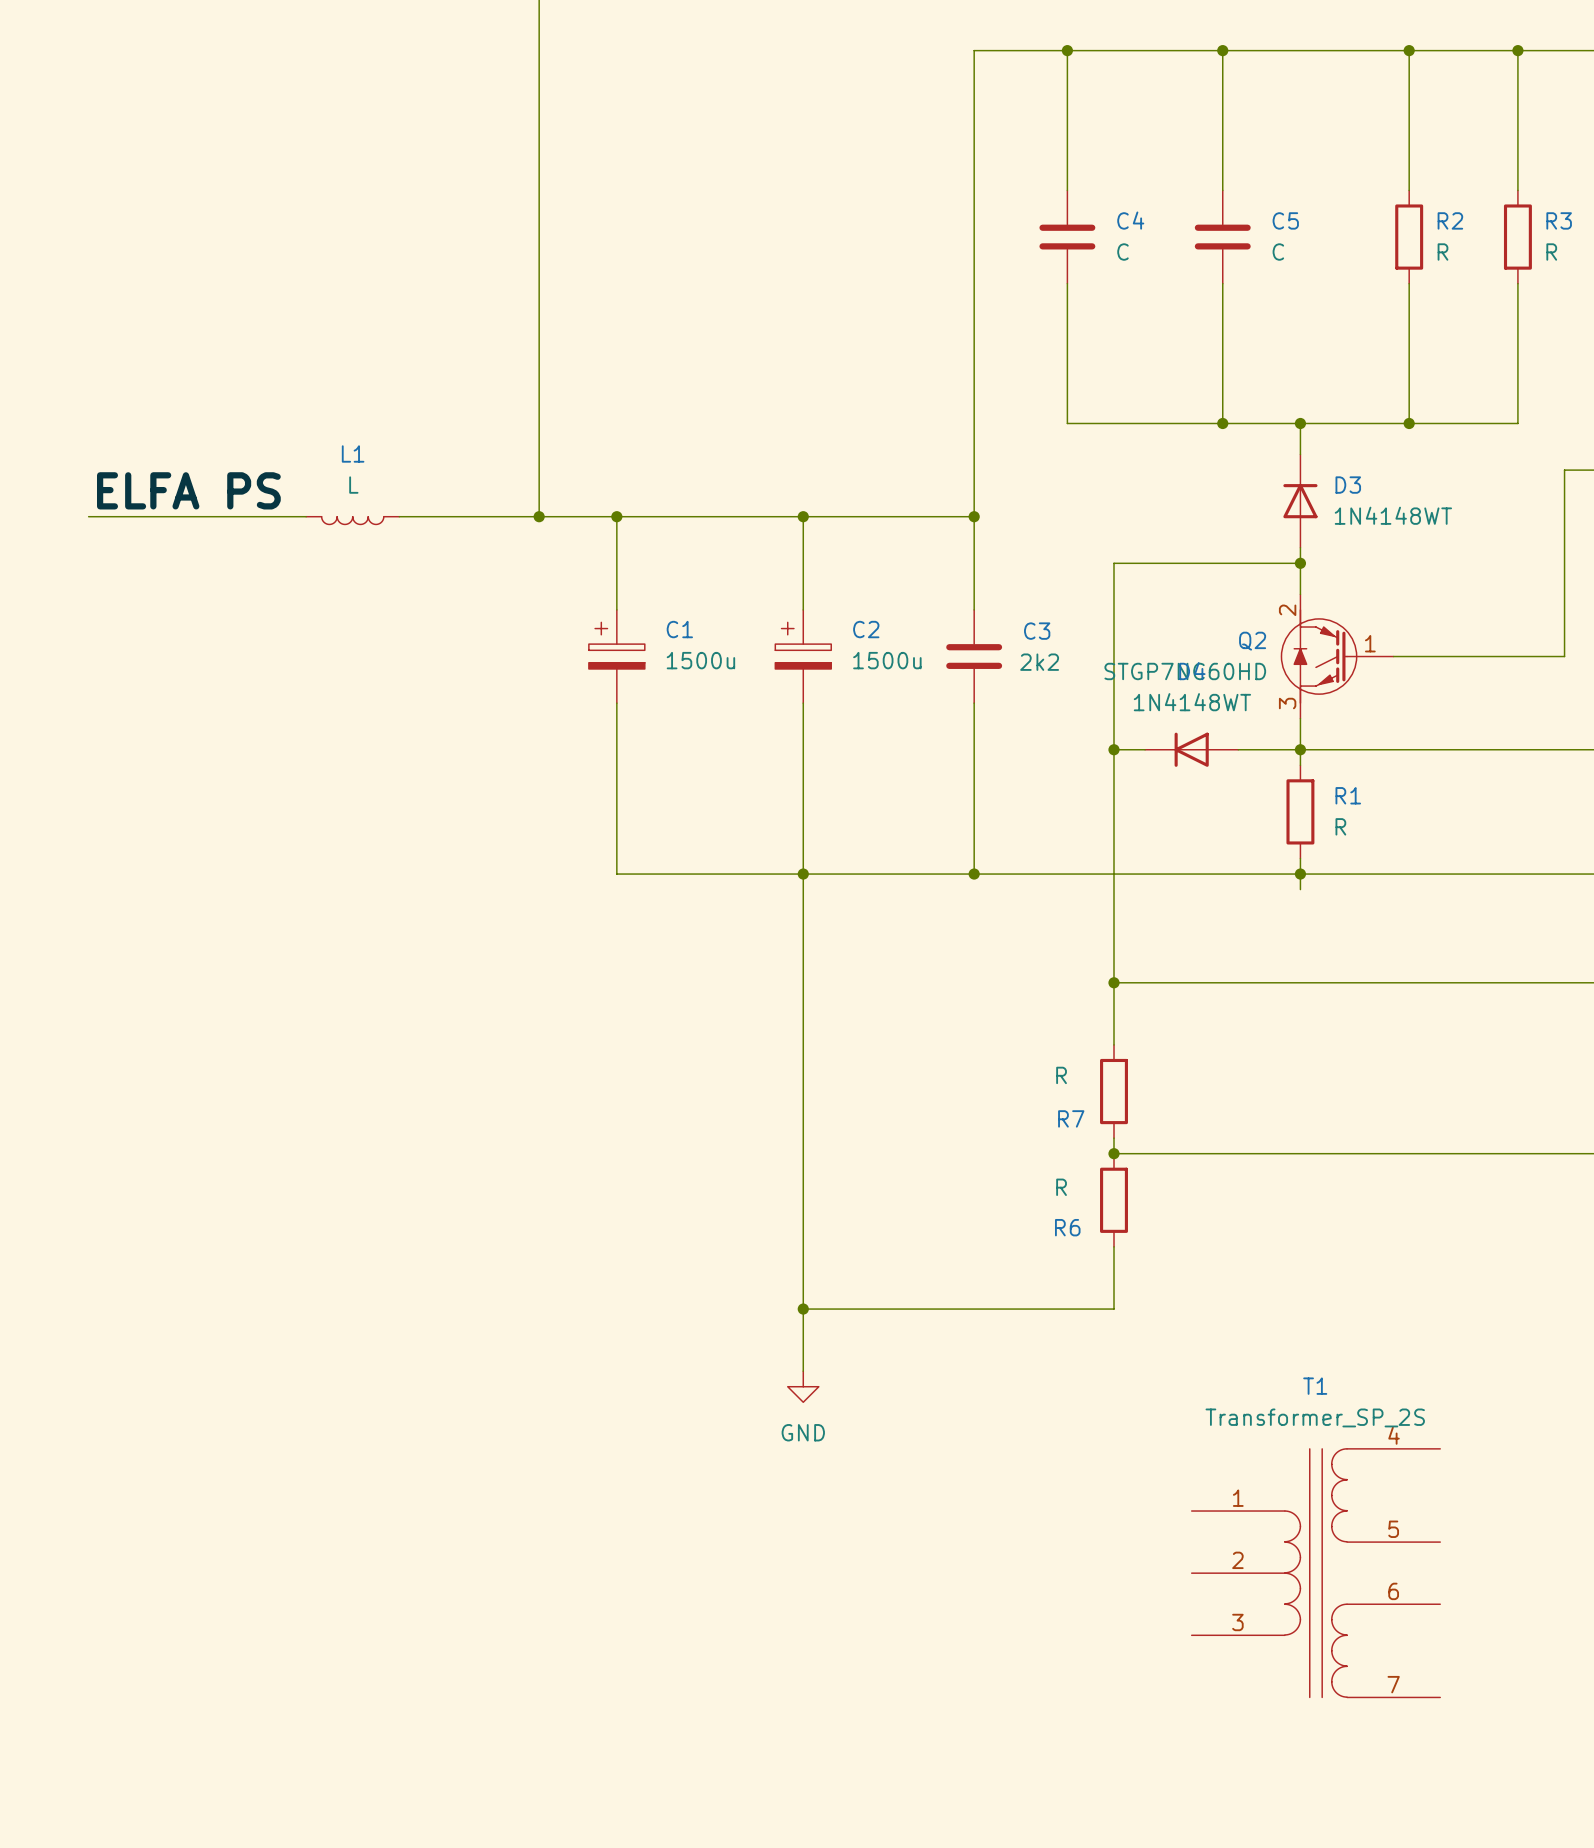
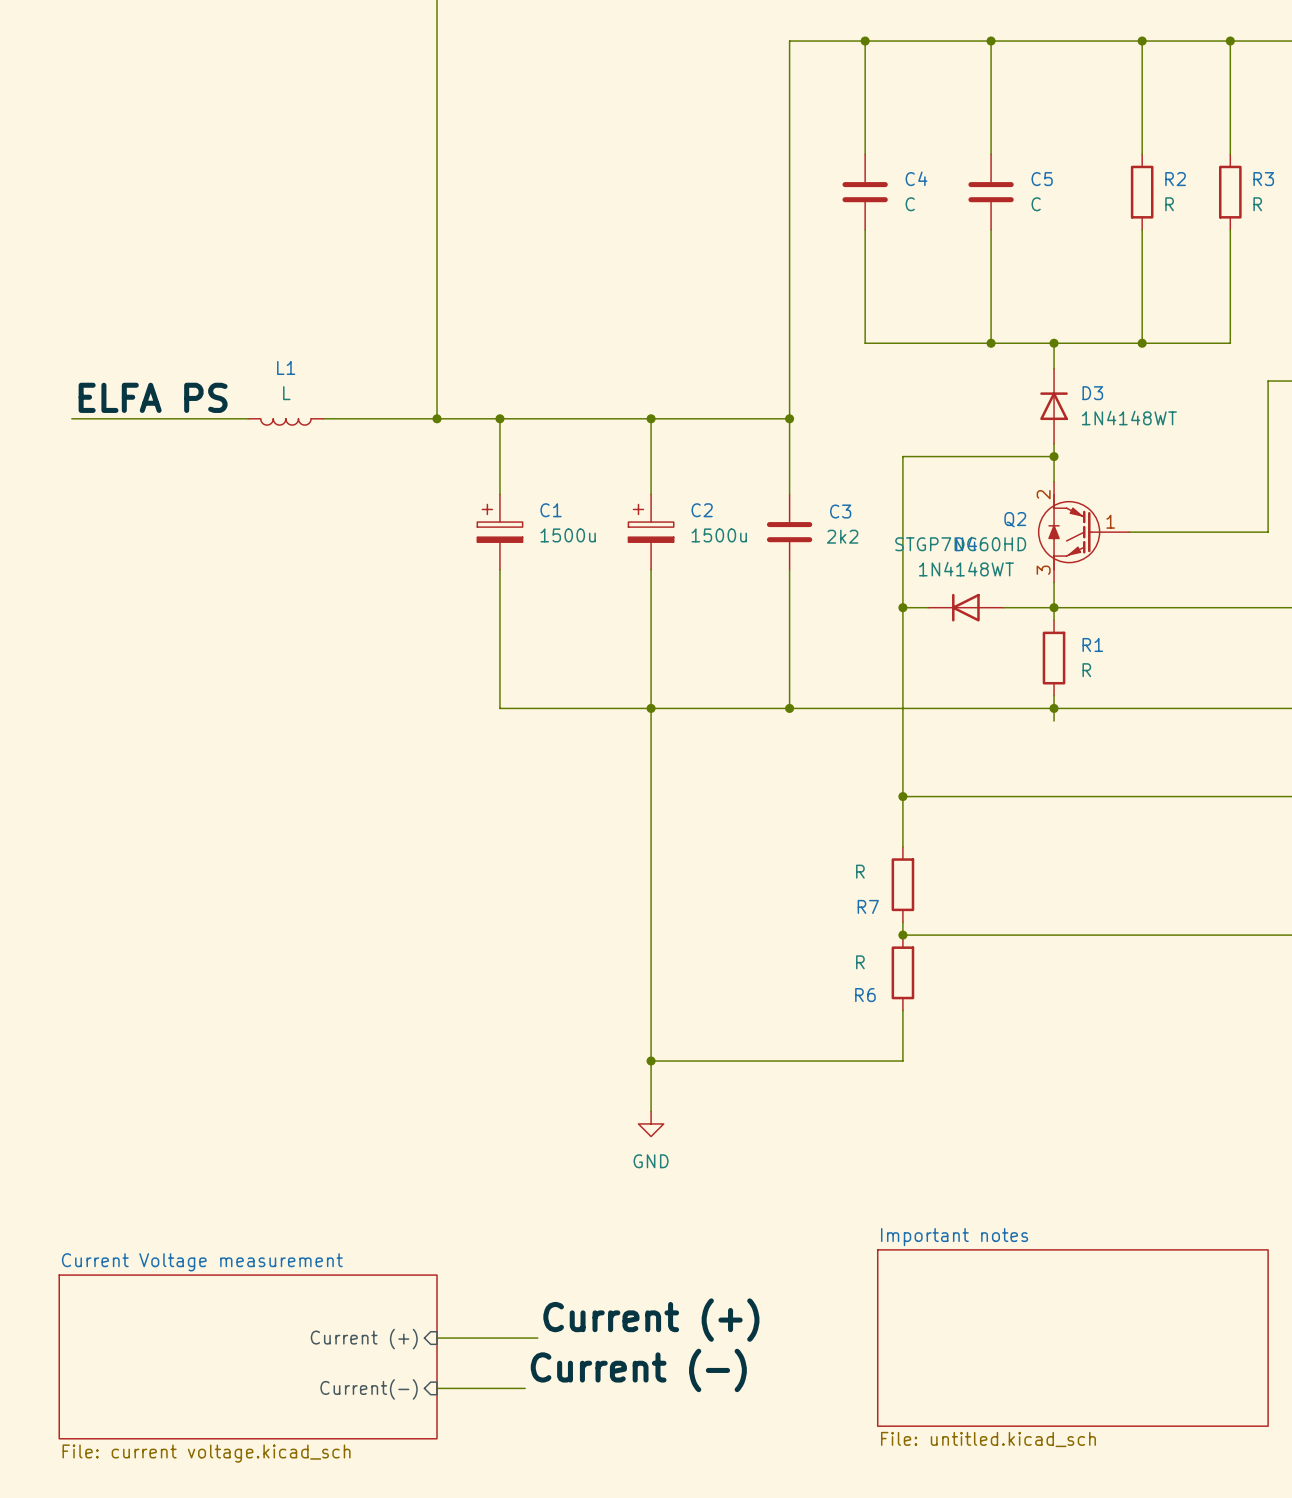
T1: Transformer_SP_2S (1315, 1573) -> none
label: none -> Current (+) (651, 1320)
wire: none -> (437, 1338) (537, 1338)
sheet Important notes: none -> File: untitled.kicad_sch (1072, 1338)
sheet pin: none -> Current (+) (364, 1339)
sheet Current Voltage measurement: none -> File: current voltage.kicad_sch (248, 1356)
label: none -> Current (-) (638, 1370)
wire: none -> (437, 1388) (525, 1388)
sheet pin: none -> Current(-) (369, 1389)

